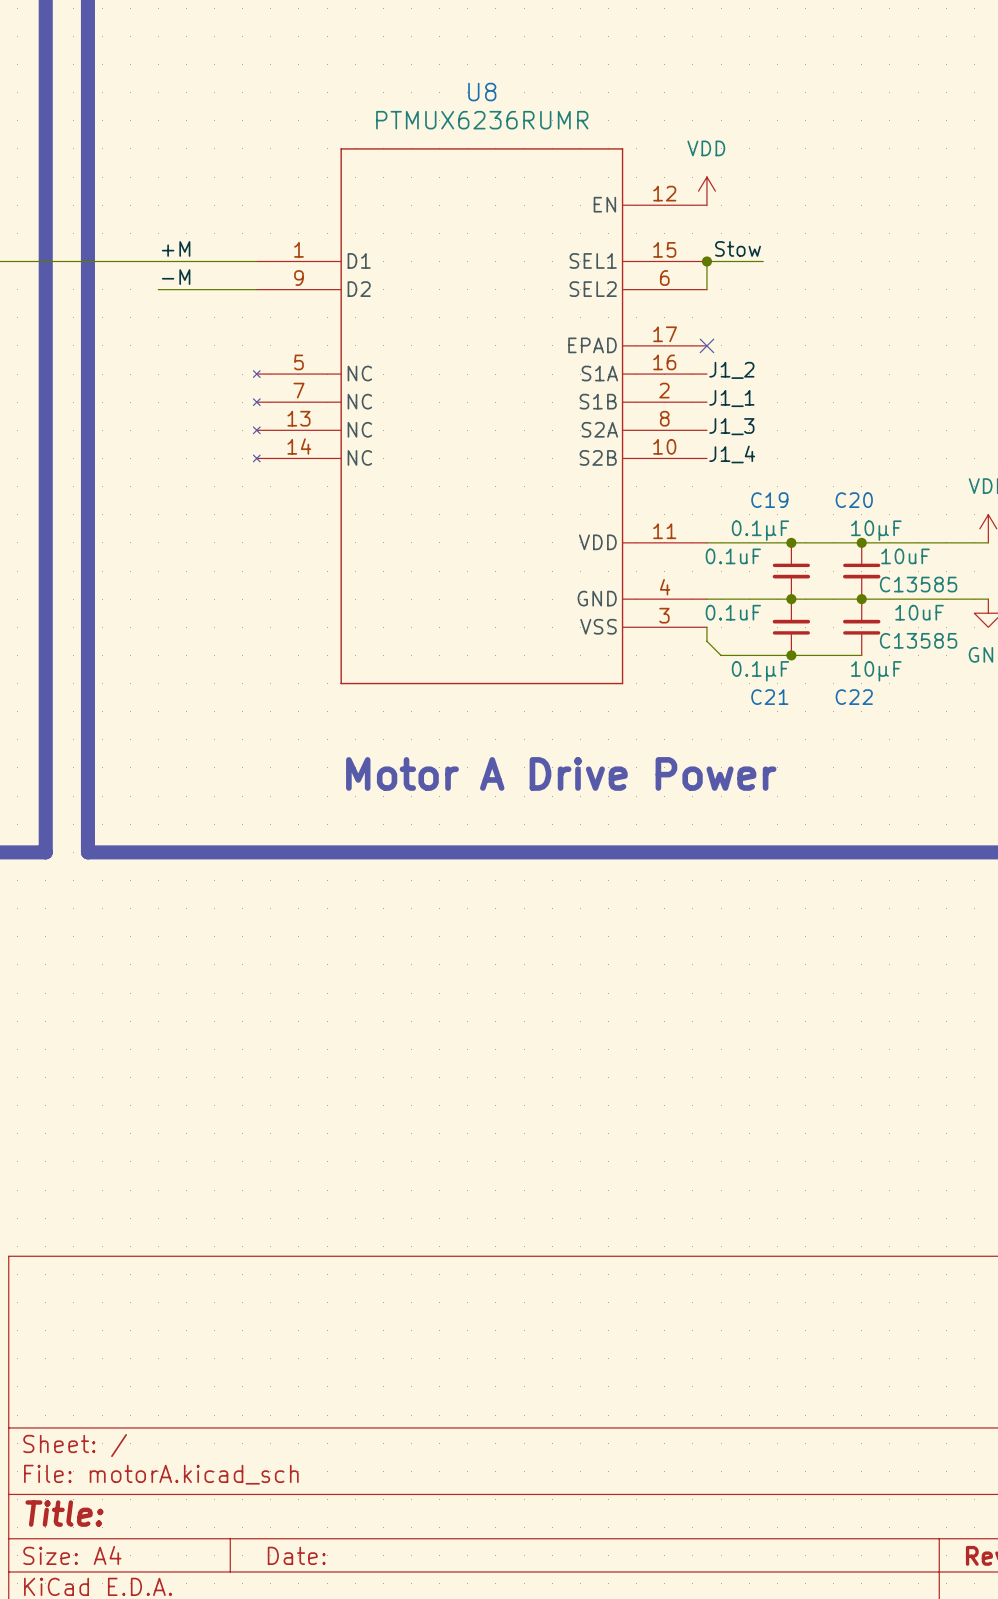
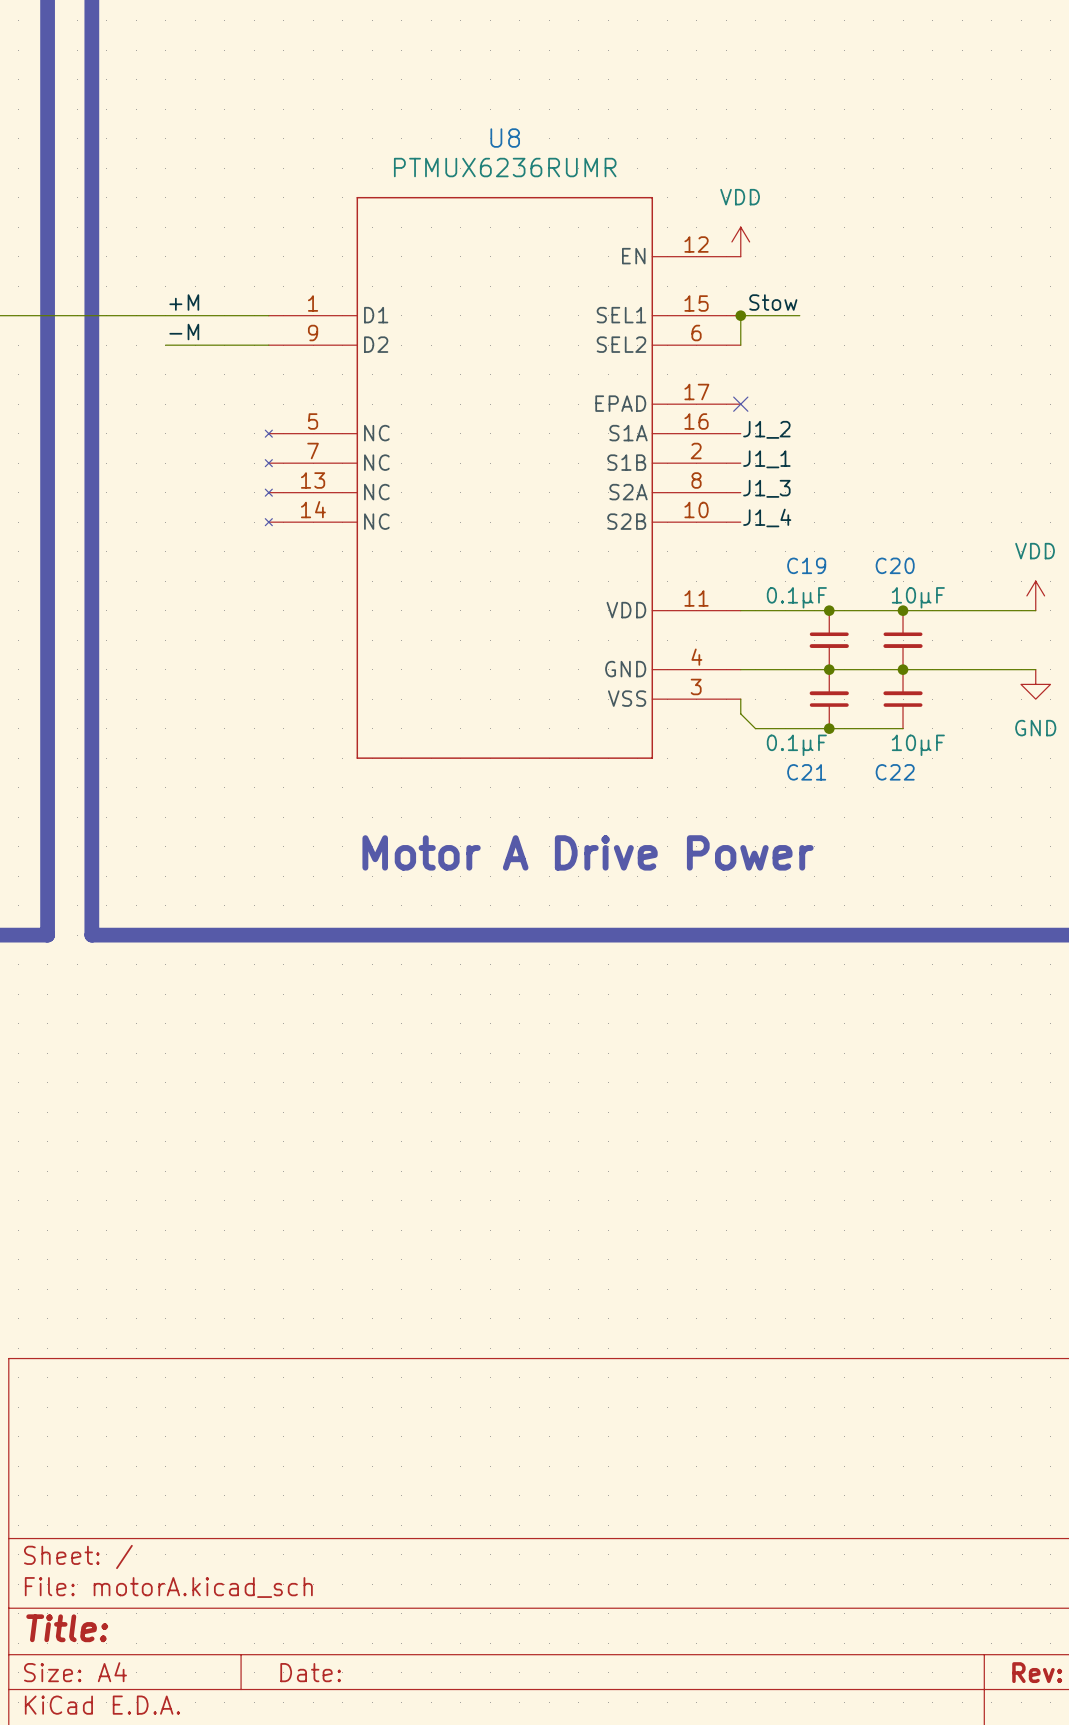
C19 text: 0.1uF (733, 556) -> none
C20 text: 10uF (905, 556) -> none
C20 text: C13585 (918, 584) -> none
C21 text: 0.1uF (733, 612) -> none
C22 text: 10uF (919, 612) -> none
C22 text: C13585 (918, 640) -> none

